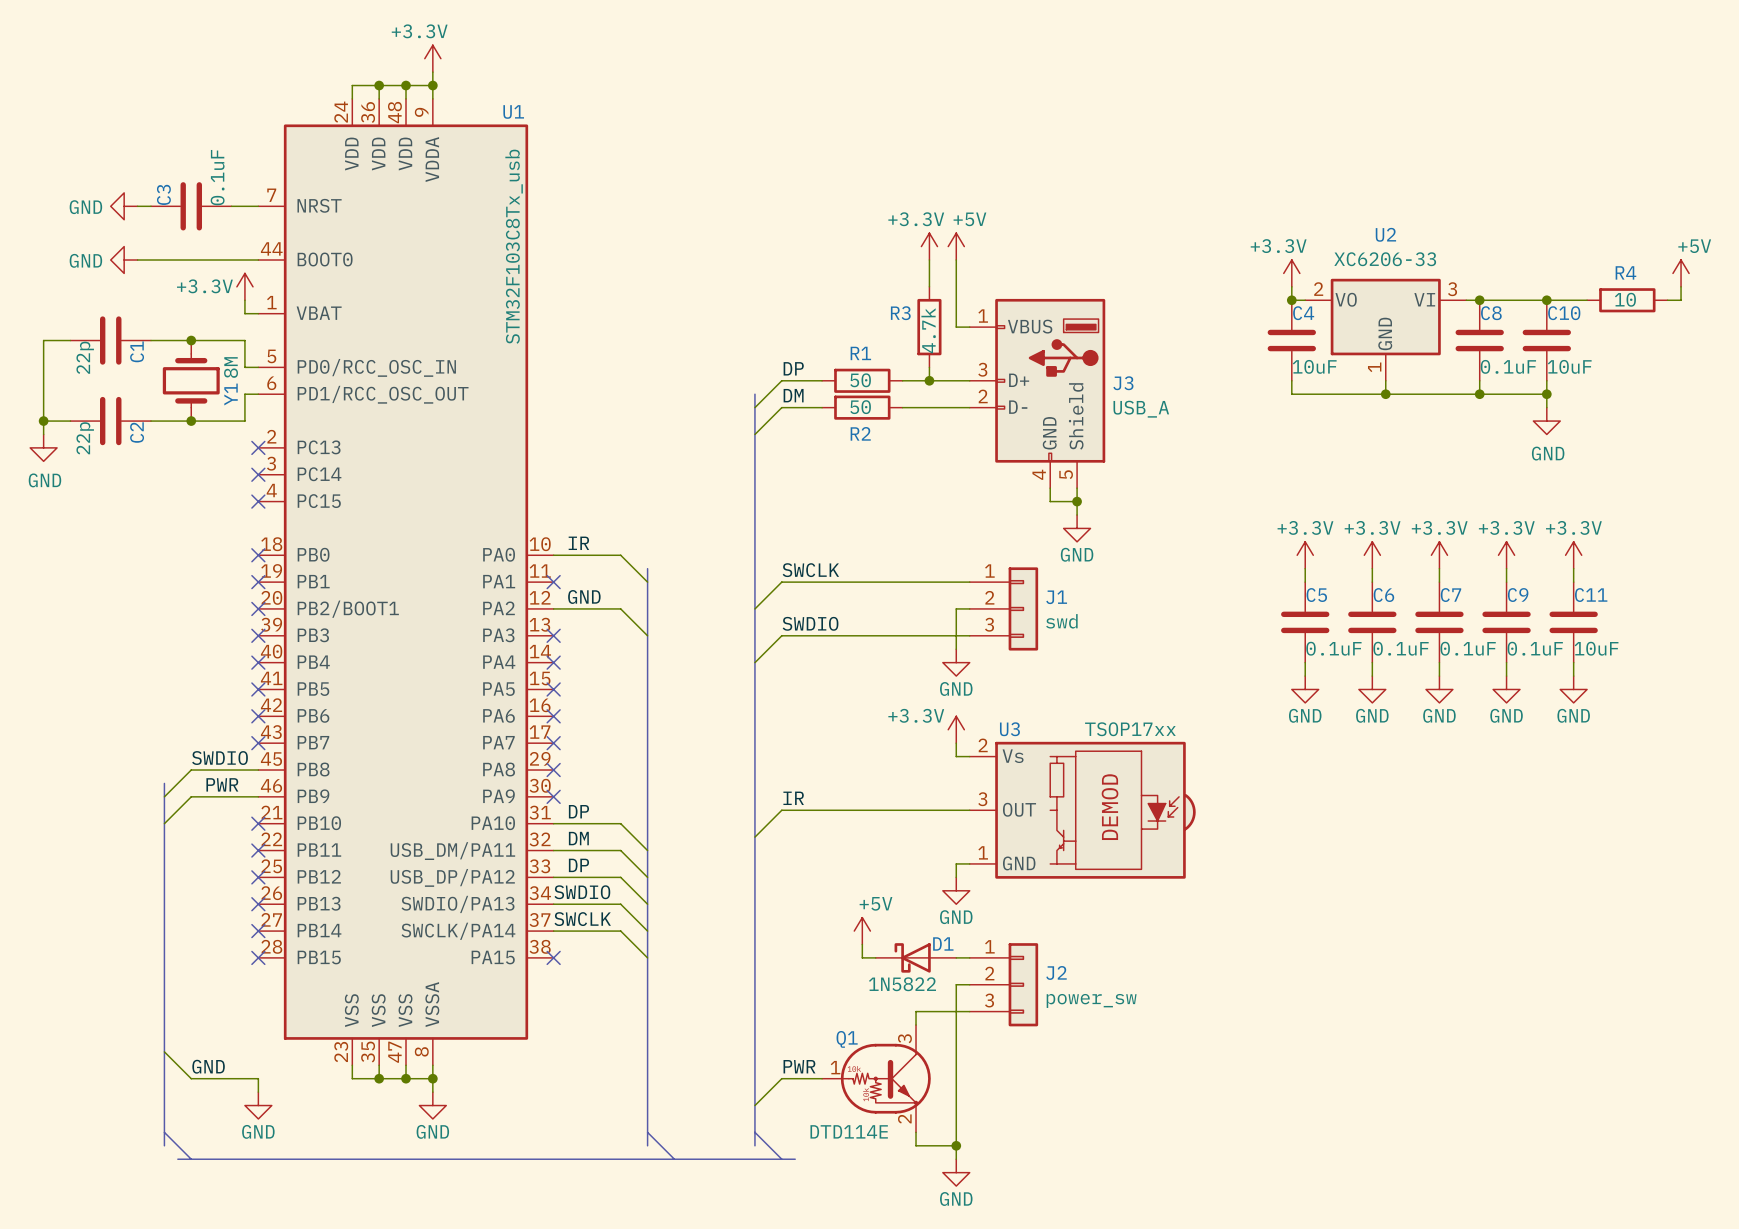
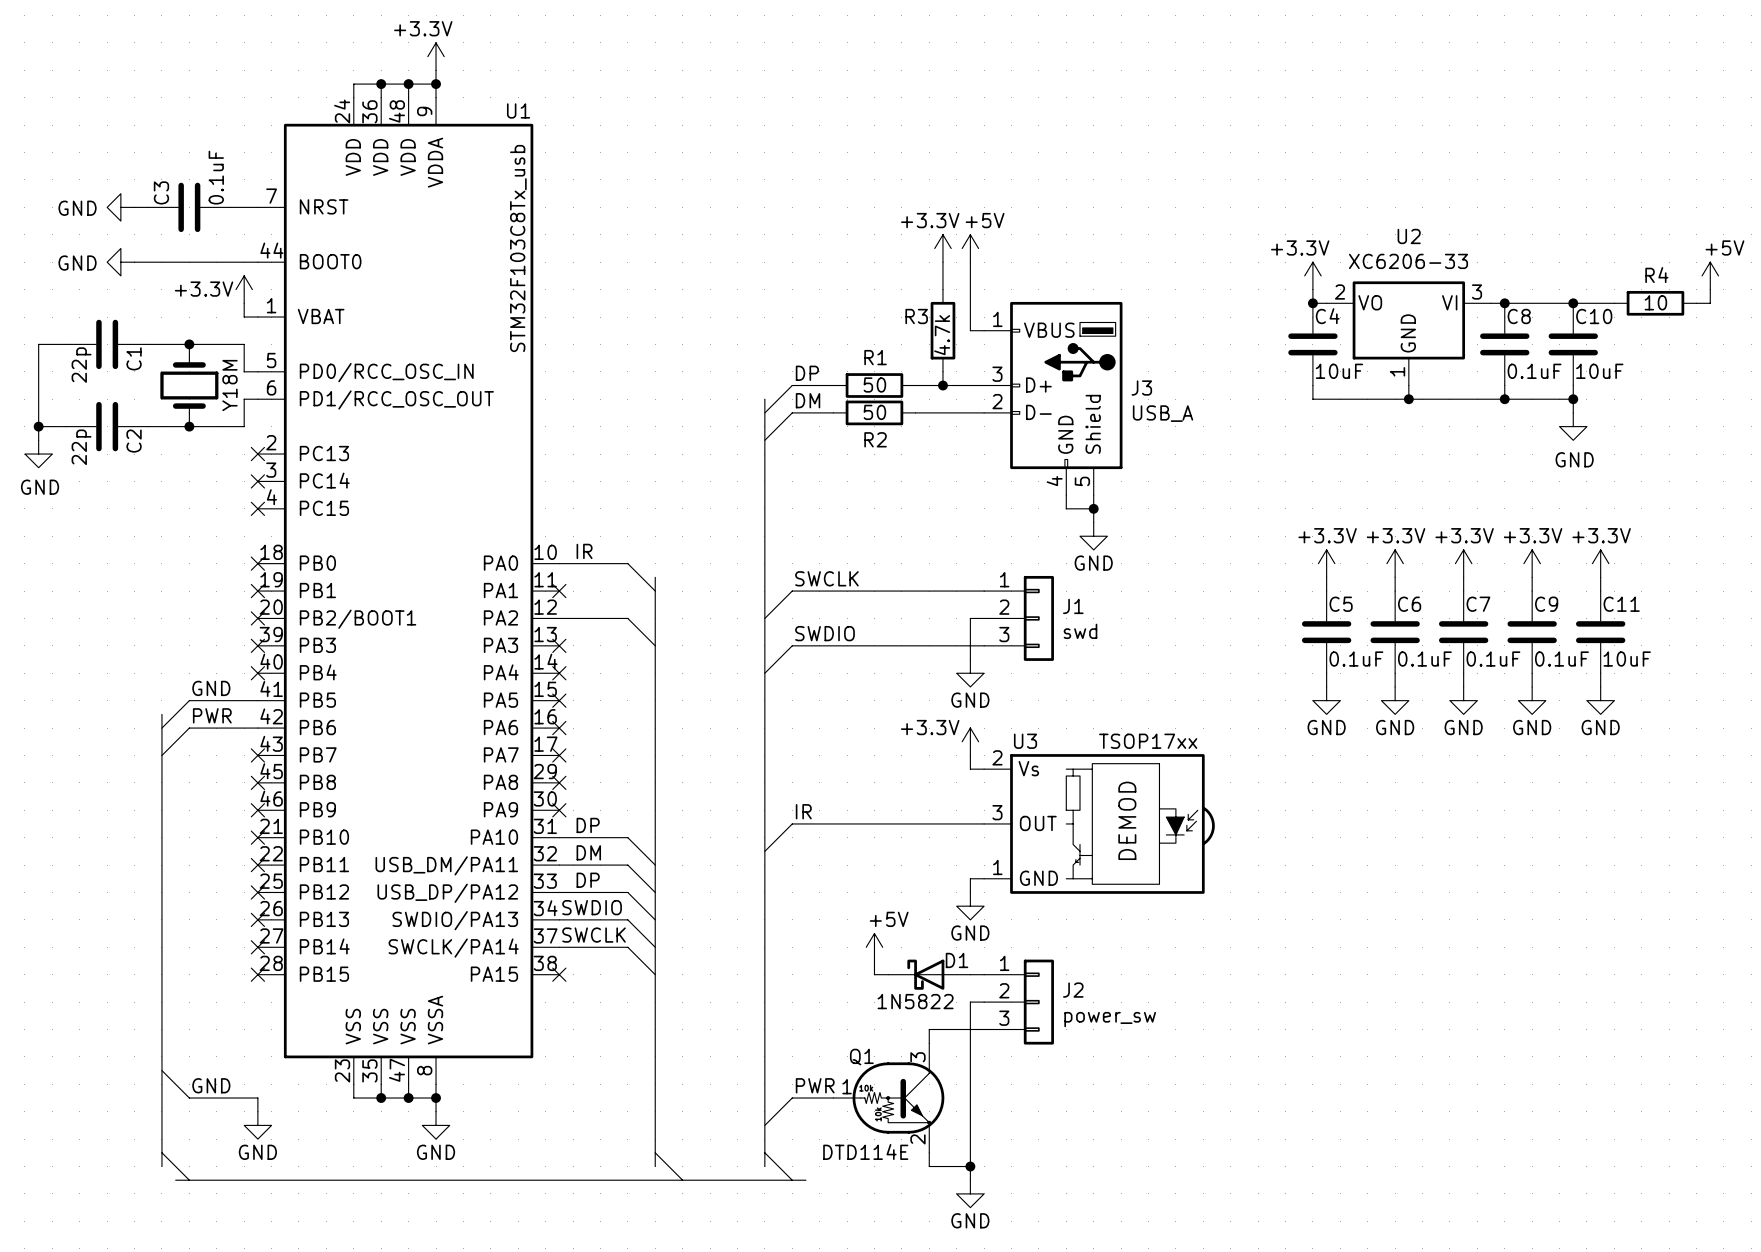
label: GND (584, 596) -> none
label: none -> GND (211, 688)
no-connect mark: (258, 689) -> none
bus: none -> (161, 714) (161, 796)
no-connect mark: (258, 716) -> none
label: SWDIO (220, 758) -> none
wire: (258, 770) (191, 770) (164, 796) -> (257, 728) (189, 728) (161, 755)
no-connect mark: none -> (257, 782)
label position: PWR (222, 784) -> PWR (212, 715)
wire: (258, 796) (191, 796) (164, 823) -> (257, 700) (189, 700) (161, 728)
no-connect mark: none -> (257, 810)

